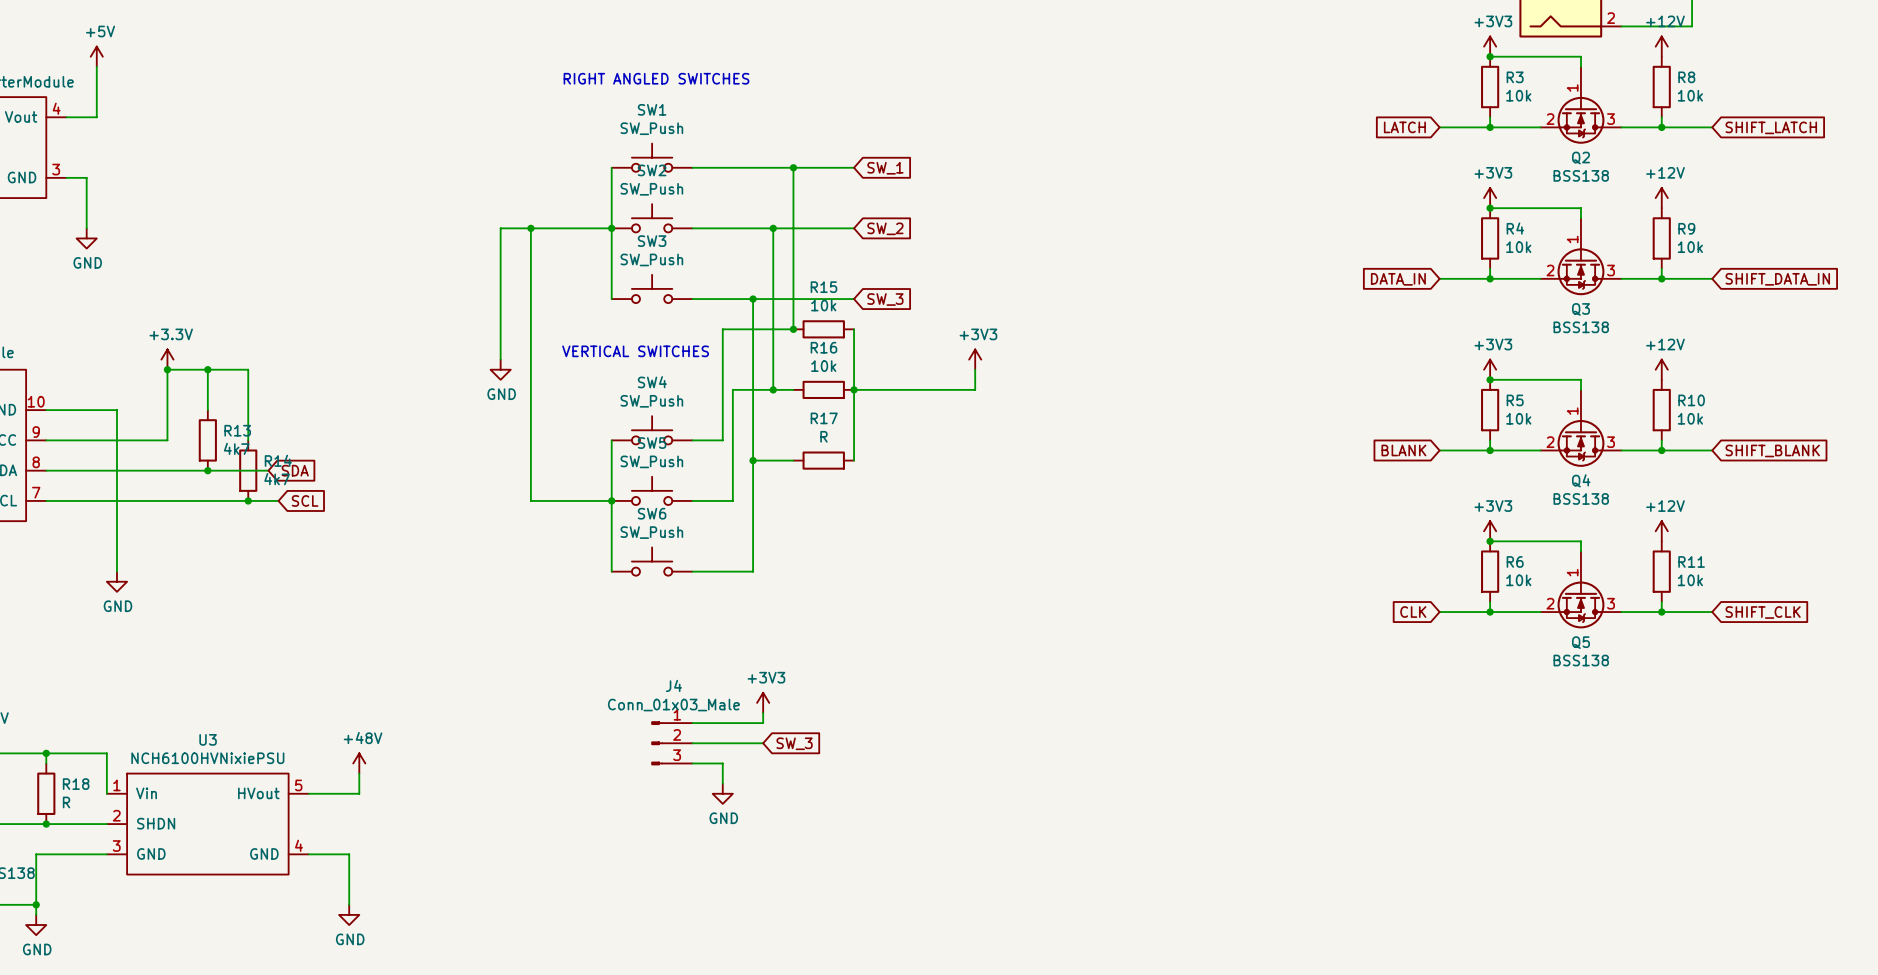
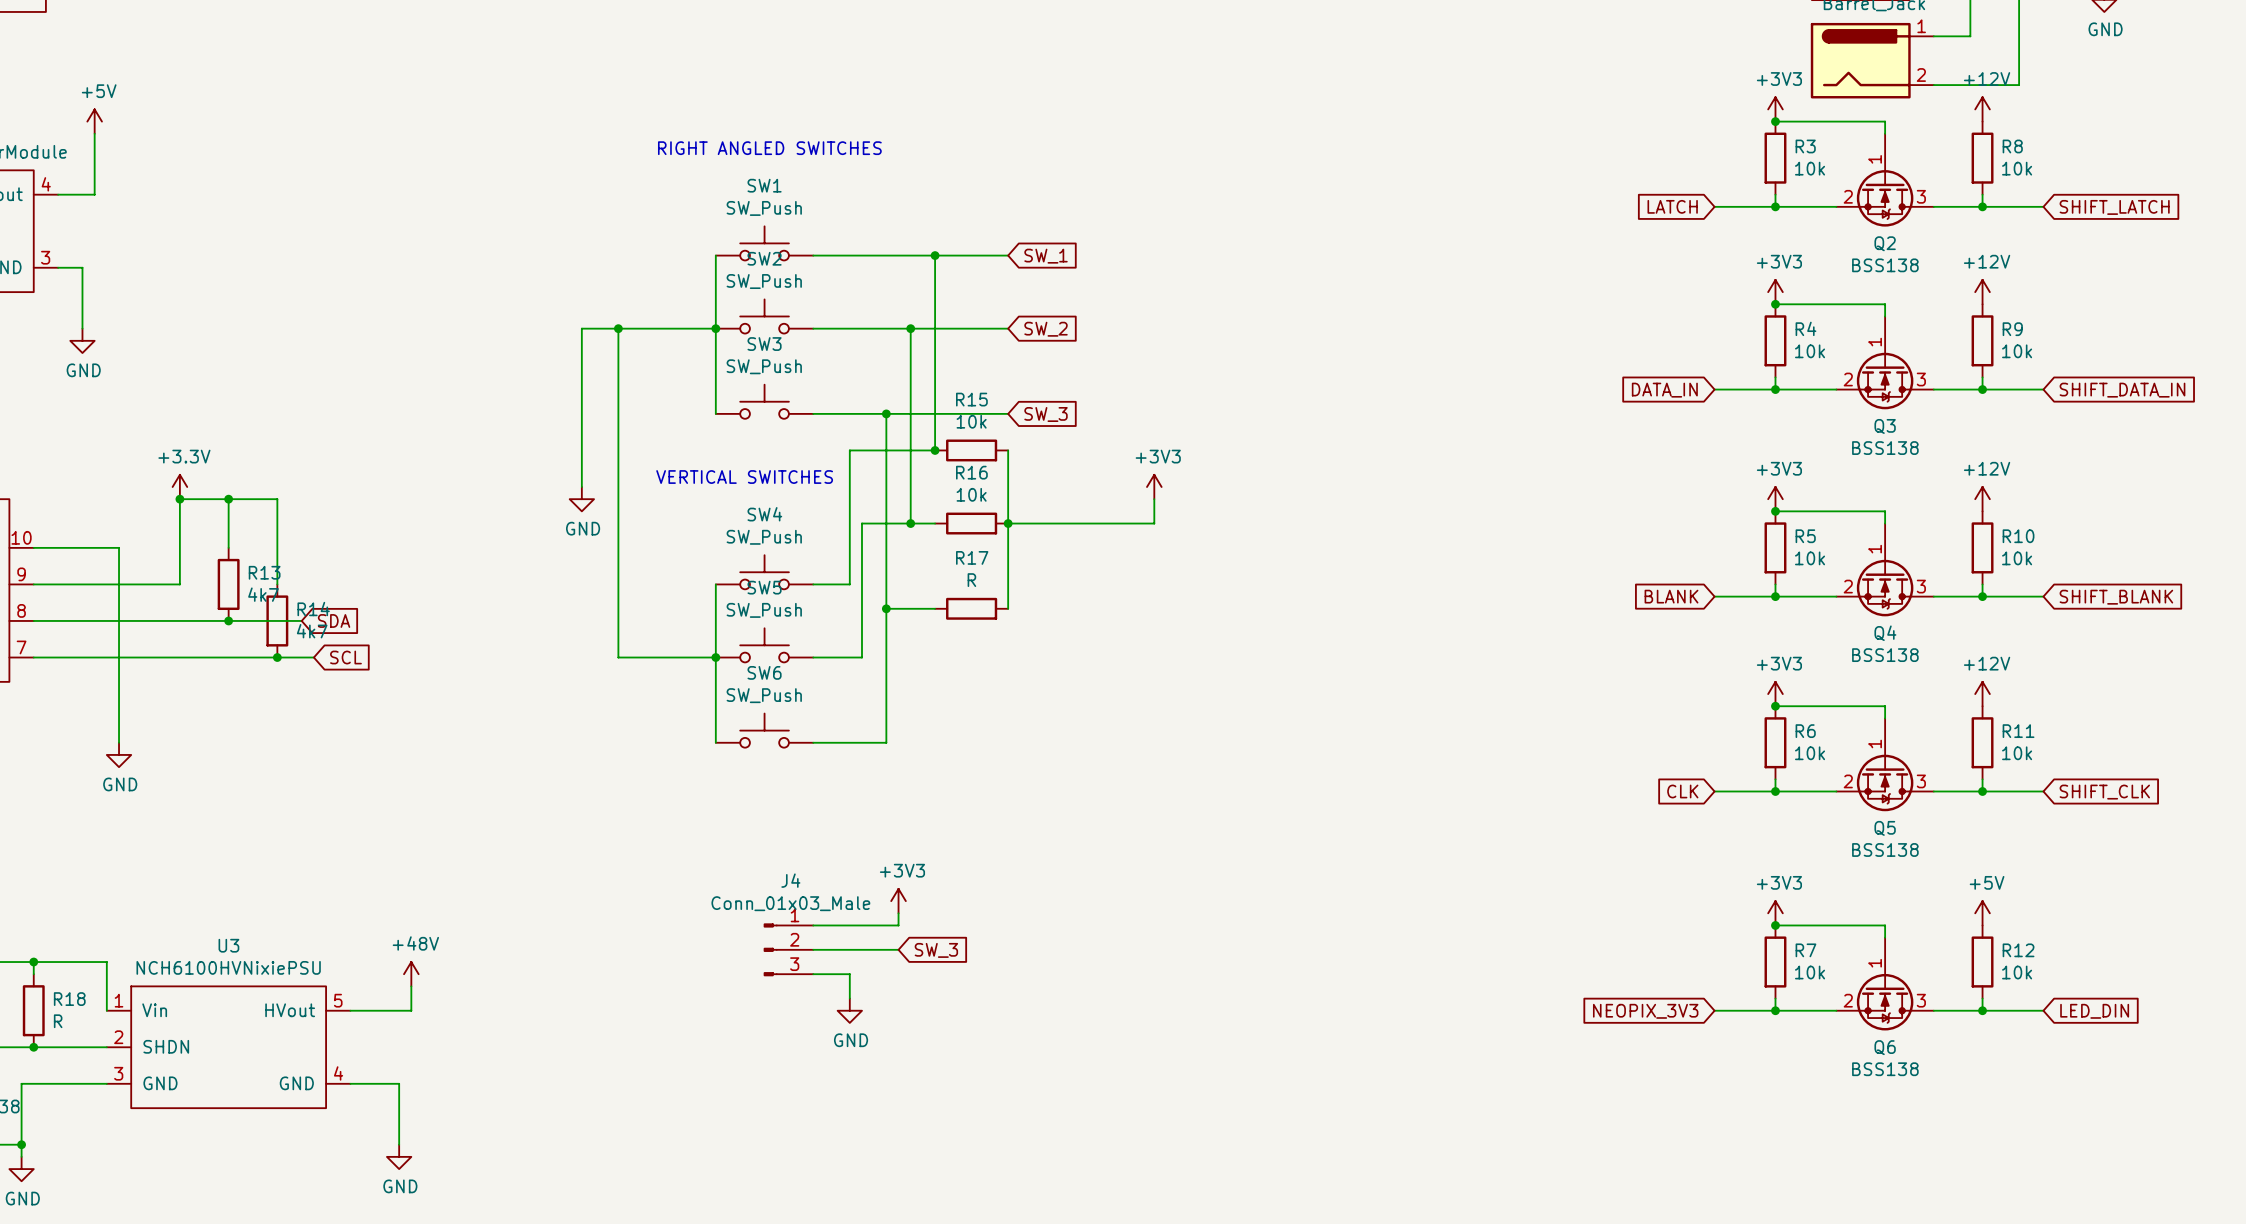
power symbol: none -> +3V3 (1775, 913)
power symbol: none -> +5V (1982, 913)
wire: none -> (1775, 925) (1885, 925) (1885, 937)
junction: none -> (1775, 925)
R7: none -> 10k (1775, 962)
R12: none -> 10k (1982, 962)
Q6: none -> BSS138 (1885, 984)
wire: none -> (1775, 998) (1775, 1010)
wire: none -> (1982, 998) (1982, 1010)
wire: none -> (1714, 1010) (1836, 1010)
junction: none -> (1775, 1010)
wire: none -> (1933, 1010) (2043, 1010)
junction: none -> (1982, 1010)
global label: none -> NEOPIX_3V3 (1645, 1011)
global label: none -> LED_DIN (2094, 1011)

